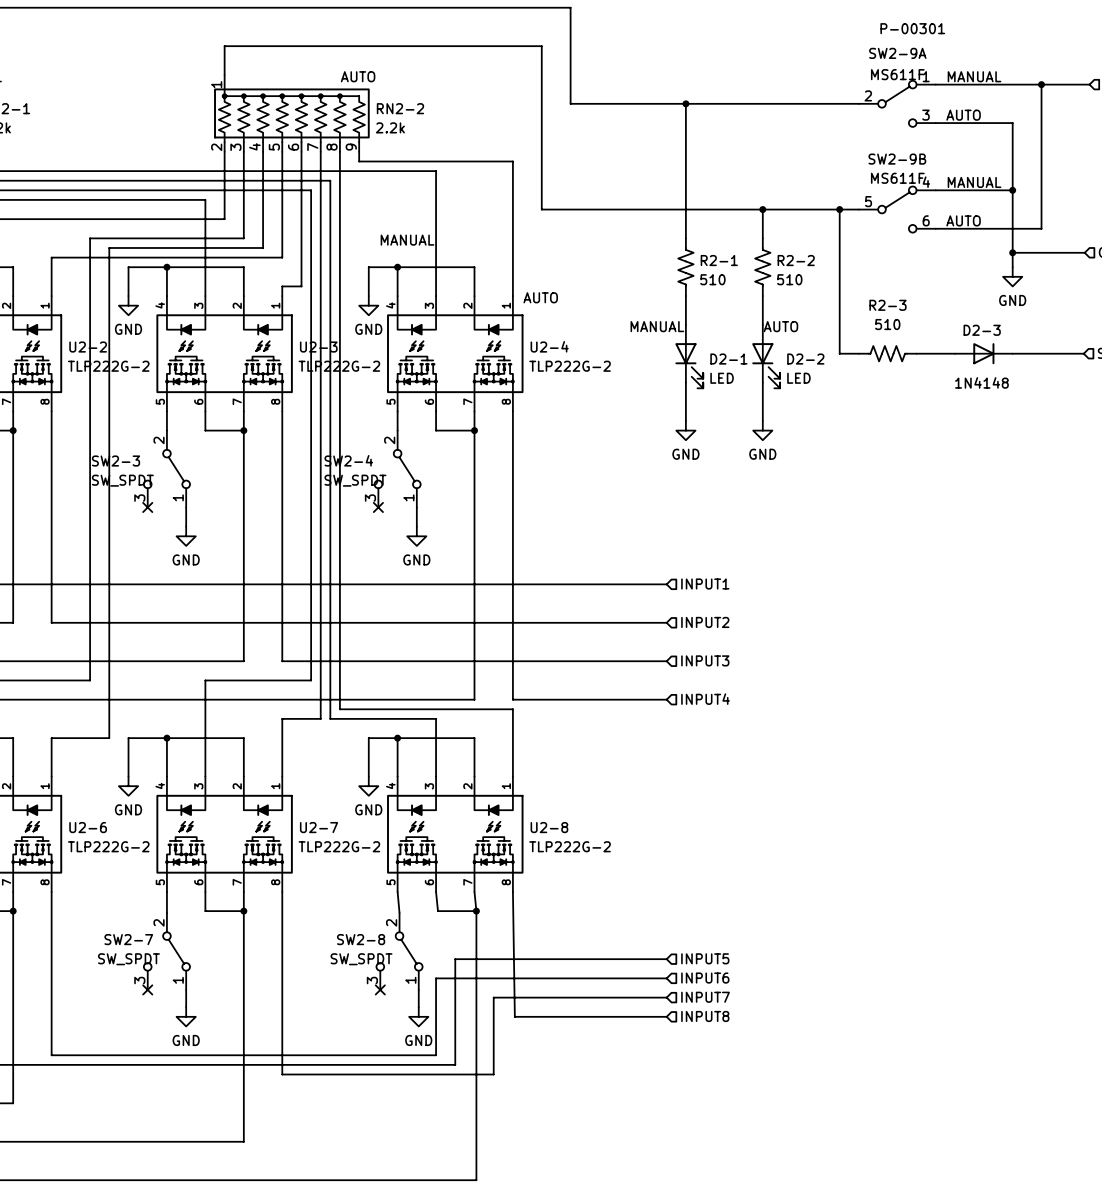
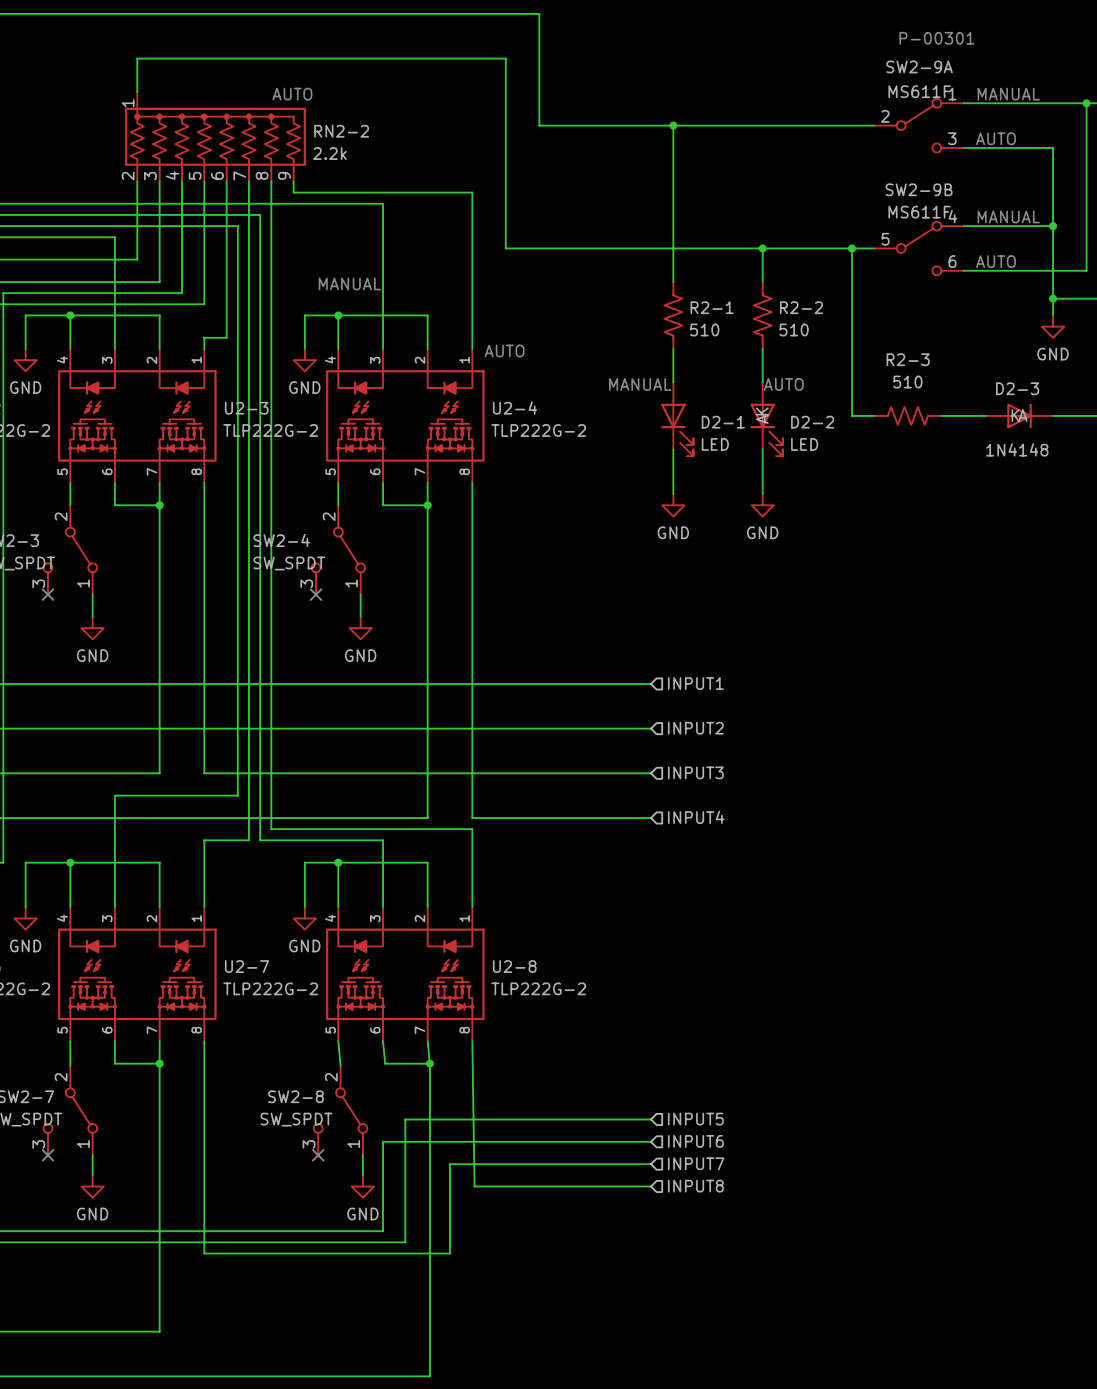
D2-2 pin name: none -> K (762, 411)
D2-3 pin name: none -> K (1015, 415)
D2-3 pin name: none -> A (1022, 415)
D2-2 pin name: none -> A (762, 419)

